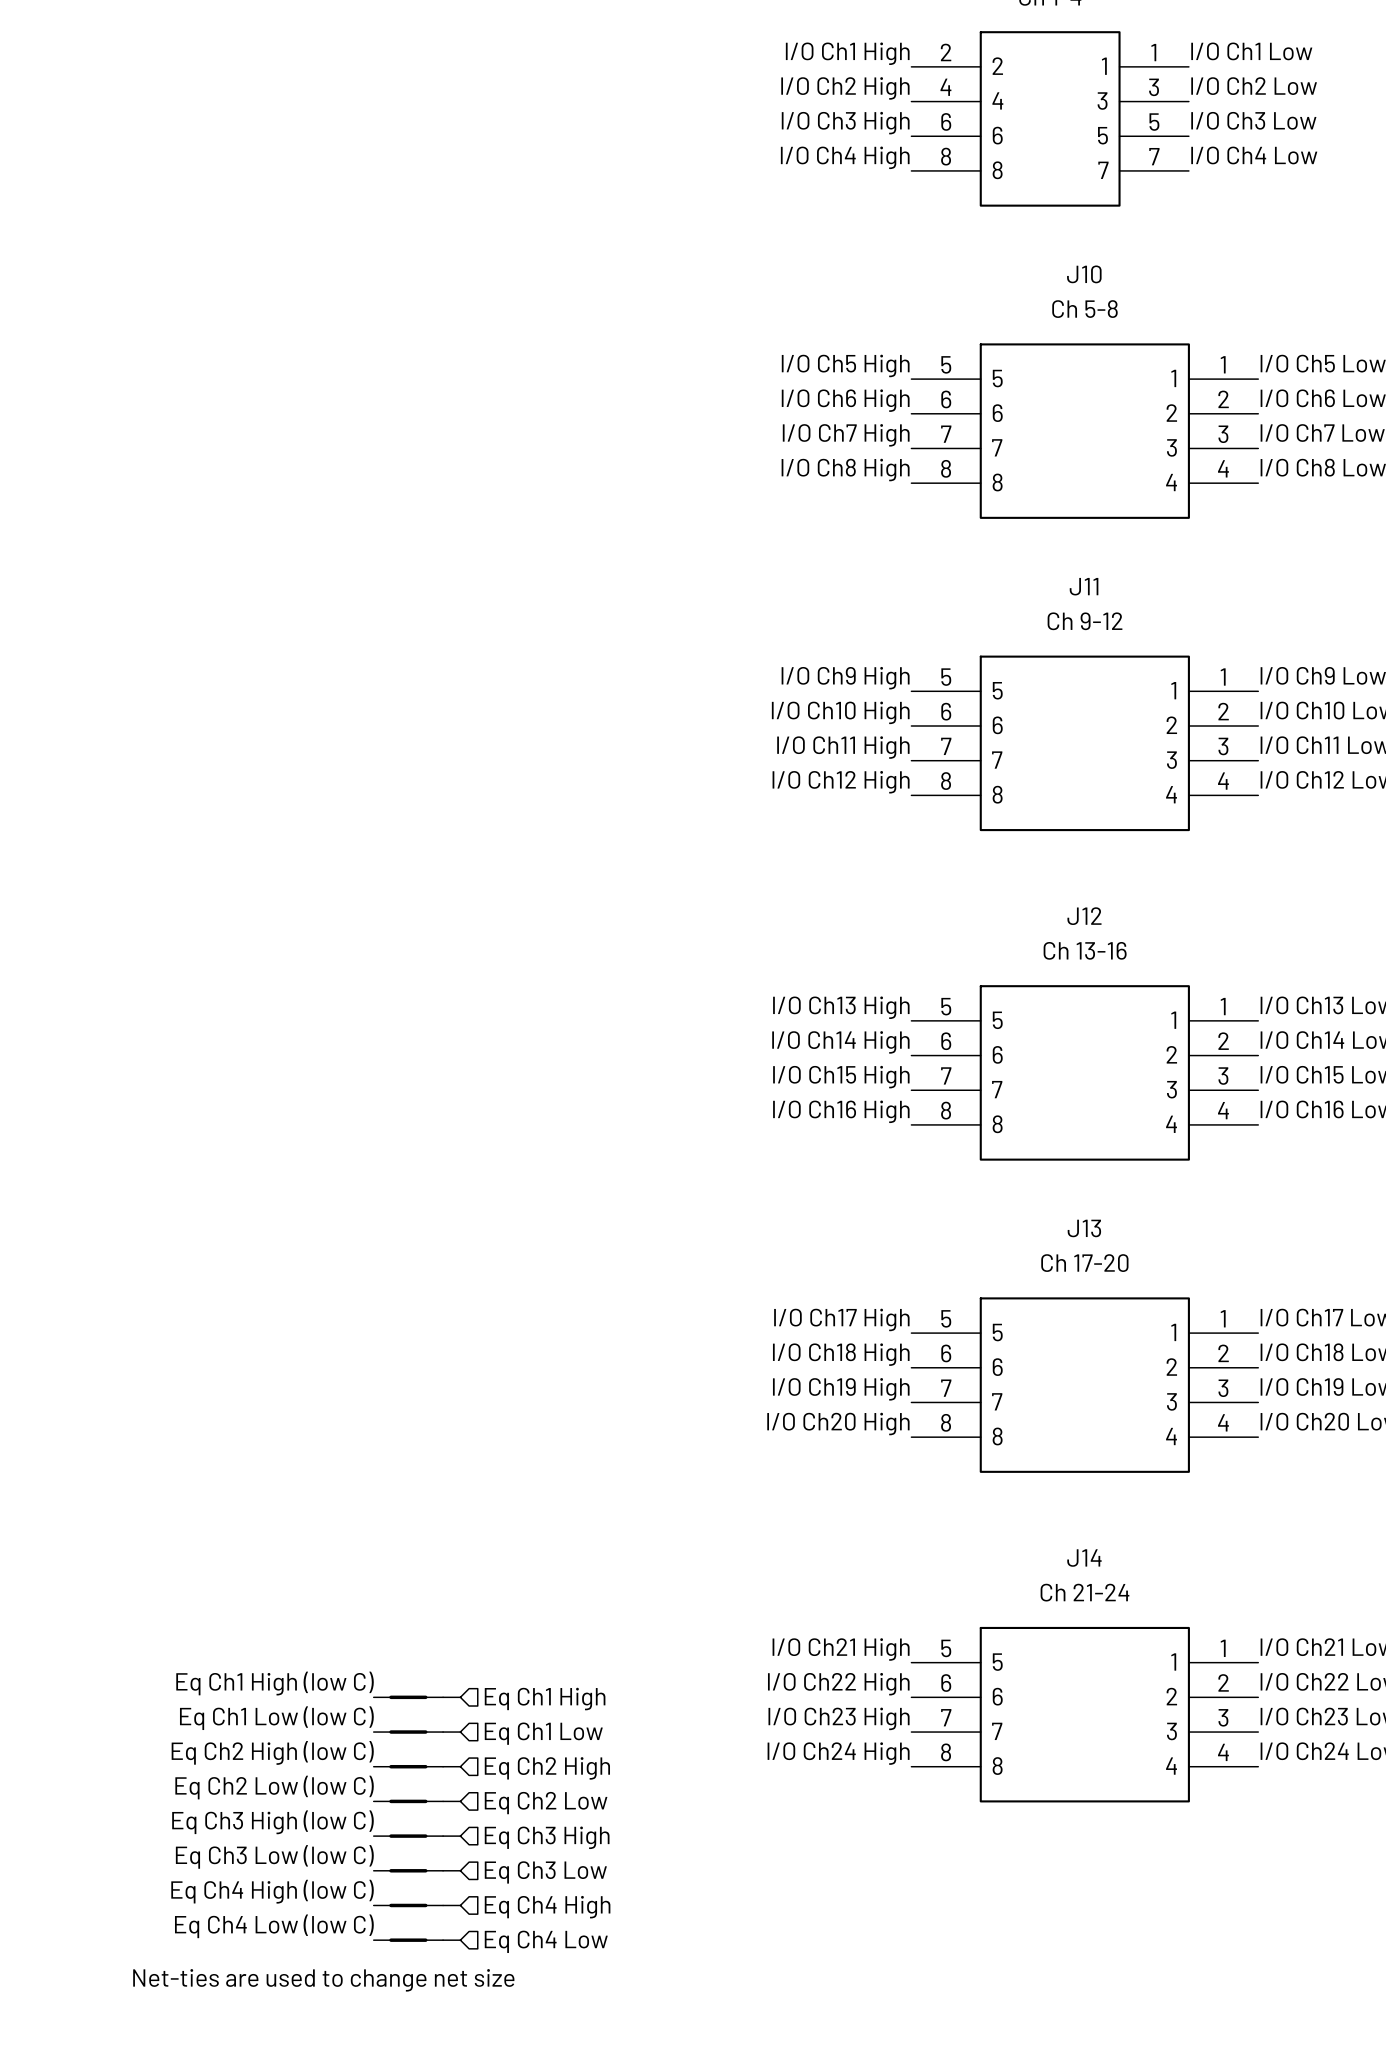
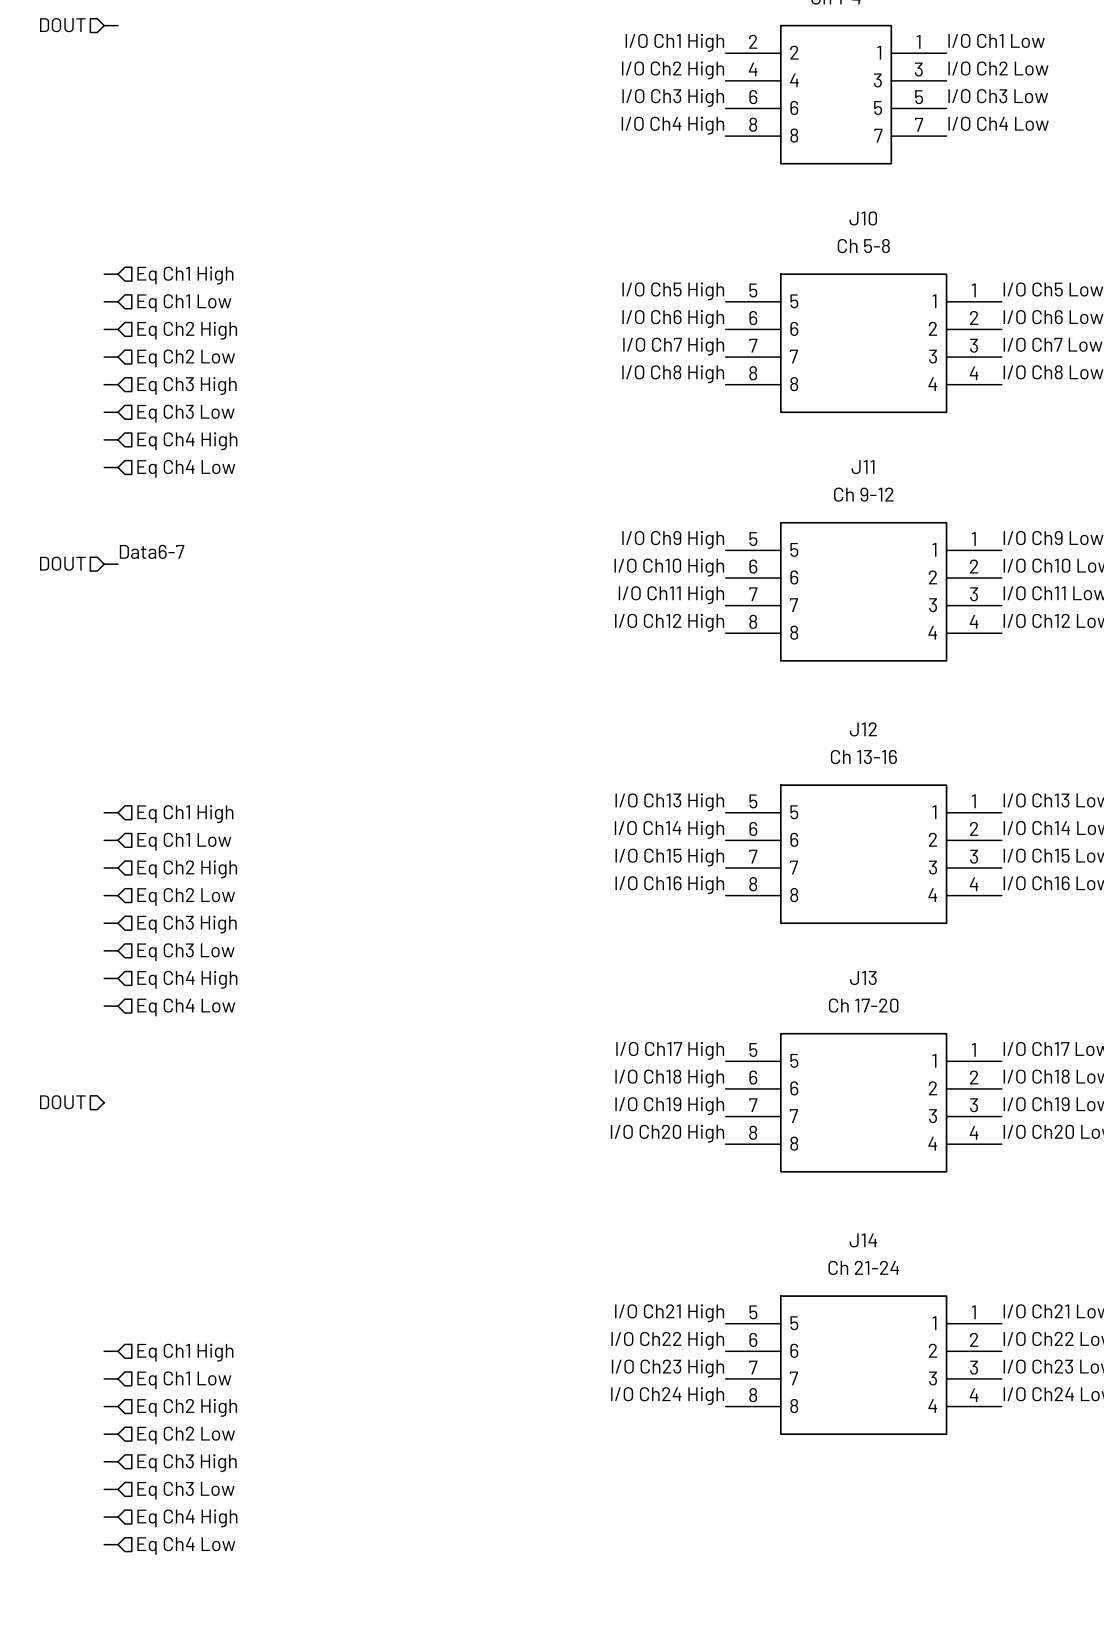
sheet pin: none -> DOUT (62, 25)
wire: none -> (104, 25) (117, 25)
wire: none -> (104, 274) (117, 274)
hierarchical label: none -> Eq Ch1 High (185, 275)
wire: none -> (104, 301) (117, 301)
hierarchical label: none -> Eq Ch1 Low (184, 303)
wire: none -> (104, 329) (117, 329)
hierarchical label: none -> Eq Ch2 High (187, 330)
wire: none -> (104, 357) (117, 357)
hierarchical label: none -> Eq Ch2 Low (186, 358)
wire: none -> (104, 384) (117, 384)
hierarchical label: none -> Eq Ch3 High (187, 386)
wire: none -> (104, 412) (117, 412)
hierarchical label: none -> Eq Ch3 Low (185, 413)
wire: none -> (104, 439) (117, 439)
hierarchical label: none -> Eq Ch4 High (187, 441)
wire: none -> (104, 467) (117, 467)
hierarchical label: none -> Eq Ch4 Low (186, 468)
label: none -> Data6-7 (152, 551)
sheet pin: none -> DOUT (62, 563)
wire: none -> (104, 564) (117, 564)
wire: none -> (104, 812) (117, 812)
hierarchical label: none -> Eq Ch1 High (185, 814)
wire: none -> (104, 840) (117, 840)
hierarchical label: none -> Eq Ch1 Low (184, 841)
wire: none -> (104, 867) (117, 867)
hierarchical label: none -> Eq Ch2 High (187, 869)
wire: none -> (104, 895) (117, 895)
hierarchical label: none -> Eq Ch2 Low (186, 896)
wire: none -> (104, 923) (117, 923)
hierarchical label: none -> Eq Ch3 High (187, 924)
wire: none -> (104, 950) (117, 950)
hierarchical label: none -> Eq Ch3 Low (185, 952)
wire: none -> (104, 978) (117, 978)
hierarchical label: none -> Eq Ch4 High (187, 979)
wire: none -> (104, 1006) (117, 1006)
hierarchical label: none -> Eq Ch4 Low (186, 1007)
sheet pin: none -> DOUT (62, 1102)
label: Eq Ch1 High (low C) (275, 1683) -> none
part: (408, 1697) -> none
wire: (443, 1697) (460, 1697) -> (104, 1351) (117, 1351)
hierarchical label position: Eq Ch1 High (545, 1699) -> Eq Ch1 High (185, 1352)
label: Eq Ch1 Low (low C) (276, 1718) -> none
part: (408, 1732) -> none
wire: (443, 1732) (460, 1732) -> (104, 1378) (117, 1378)
hierarchical label position: Eq Ch1 Low (543, 1733) -> Eq Ch1 Low (184, 1380)
label: Eq Ch2 High (low C) (272, 1752) -> none
part: (408, 1766) -> none
wire: (443, 1766) (460, 1766) -> (104, 1406) (117, 1406)
hierarchical label position: Eq Ch2 High (547, 1768) -> Eq Ch2 High (187, 1407)
label: Eq Ch2 Low (low C) (274, 1787) -> none
part: (408, 1801) -> none
wire: (443, 1801) (460, 1801) -> (104, 1434) (117, 1434)
hierarchical label position: Eq Ch2 Low (546, 1803) -> Eq Ch2 Low (186, 1435)
label: Eq Ch3 High (low C) (272, 1822) -> none
part: (408, 1836) -> none
wire: (443, 1836) (460, 1836) -> (104, 1461) (117, 1461)
hierarchical label position: Eq Ch3 High (547, 1837) -> Eq Ch3 High (187, 1463)
label: Eq Ch3 Low (low C) (274, 1856) -> none
part: (408, 1870) -> none
wire: (443, 1870) (460, 1870) -> (104, 1489) (117, 1489)
hierarchical label position: Eq Ch3 Low (545, 1872) -> Eq Ch3 Low (185, 1490)
label: Eq Ch4 High (low C) (272, 1891) -> none
part: (408, 1905) -> none
wire: (443, 1905) (460, 1905) -> (104, 1517) (117, 1517)
hierarchical label position: Eq Ch4 High (547, 1907) -> Eq Ch4 High (187, 1518)
label: Eq Ch4 Low (low C) (274, 1926) -> none
part: (408, 1940) -> none
wire: (443, 1940) (460, 1940) -> (104, 1544) (117, 1544)
hierarchical label position: Eq Ch4 Low (546, 1941) -> Eq Ch4 Low (186, 1545)
text: Net-ties are used to change net size (323, 1980) -> none

